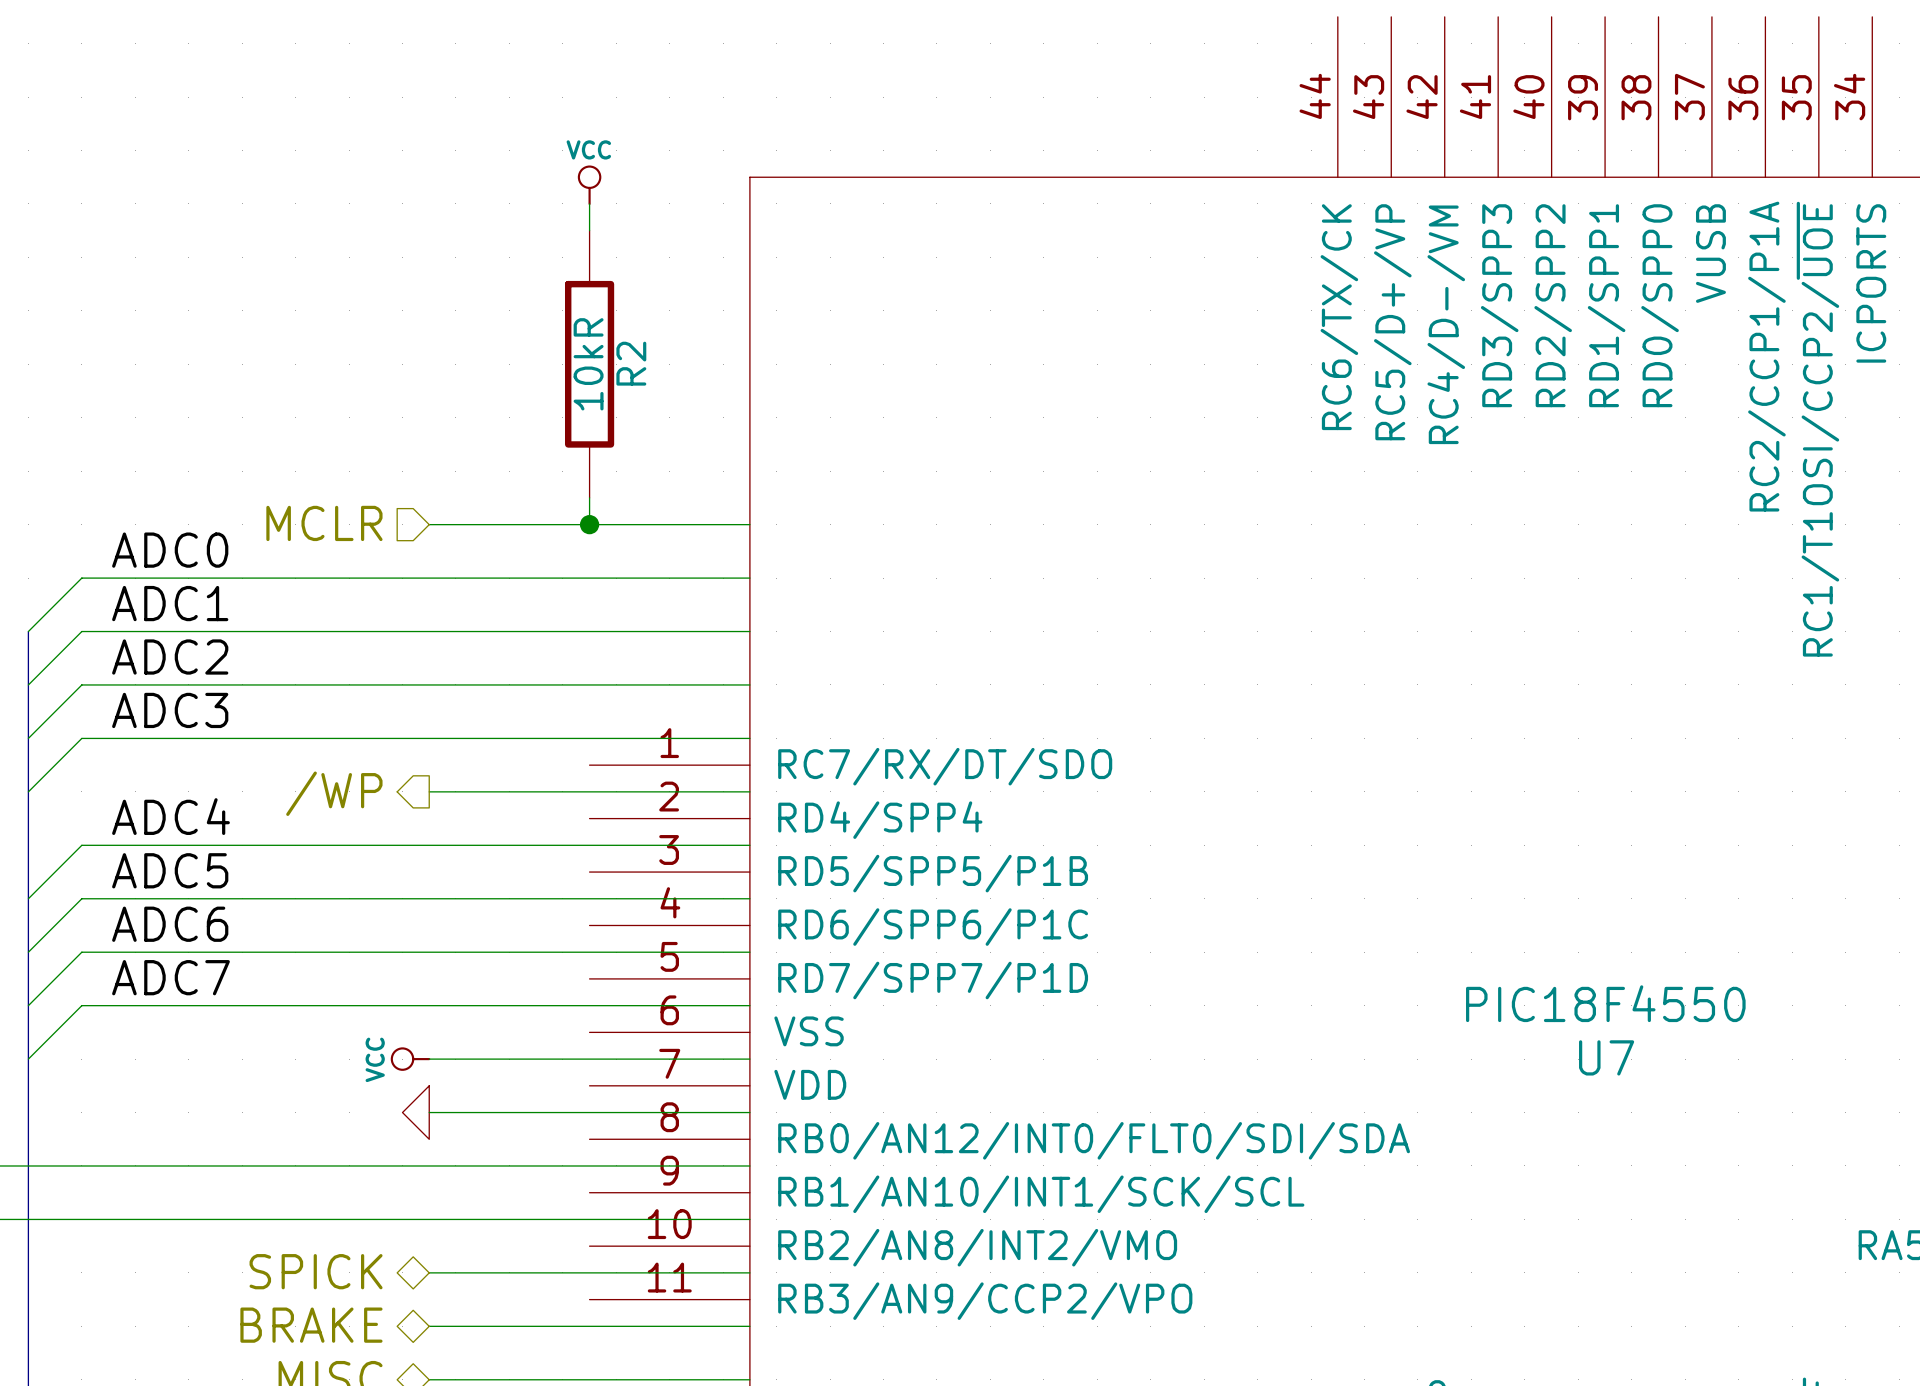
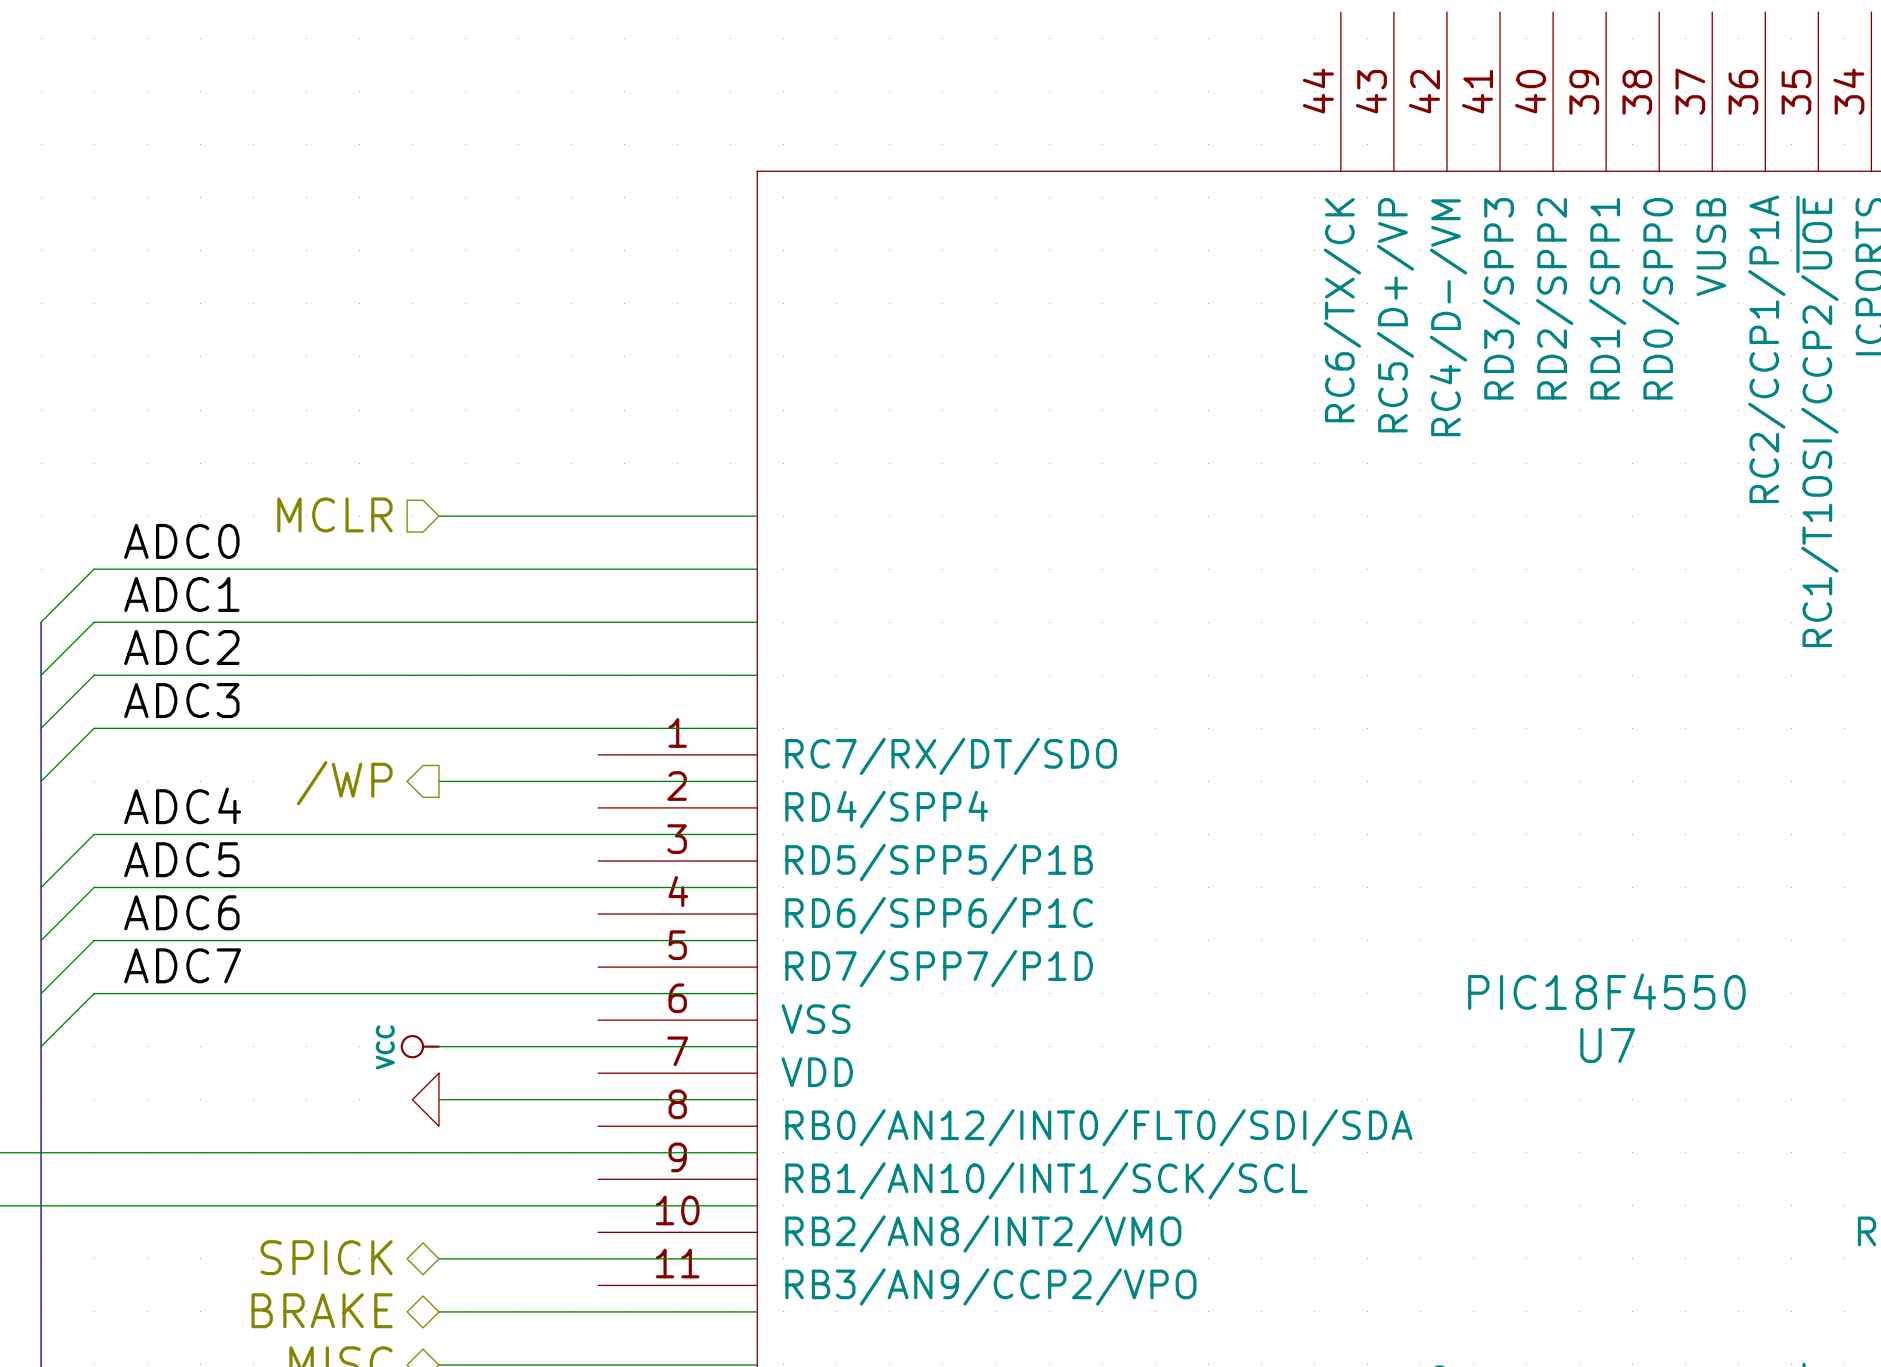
power symbol: VCC (589, 185) -> none
wire: (589, 203) (589, 230) -> none
R2: 10kR (589, 364) -> none
wire: (589, 497) (589, 524) -> none
junction: (589, 524) -> none

